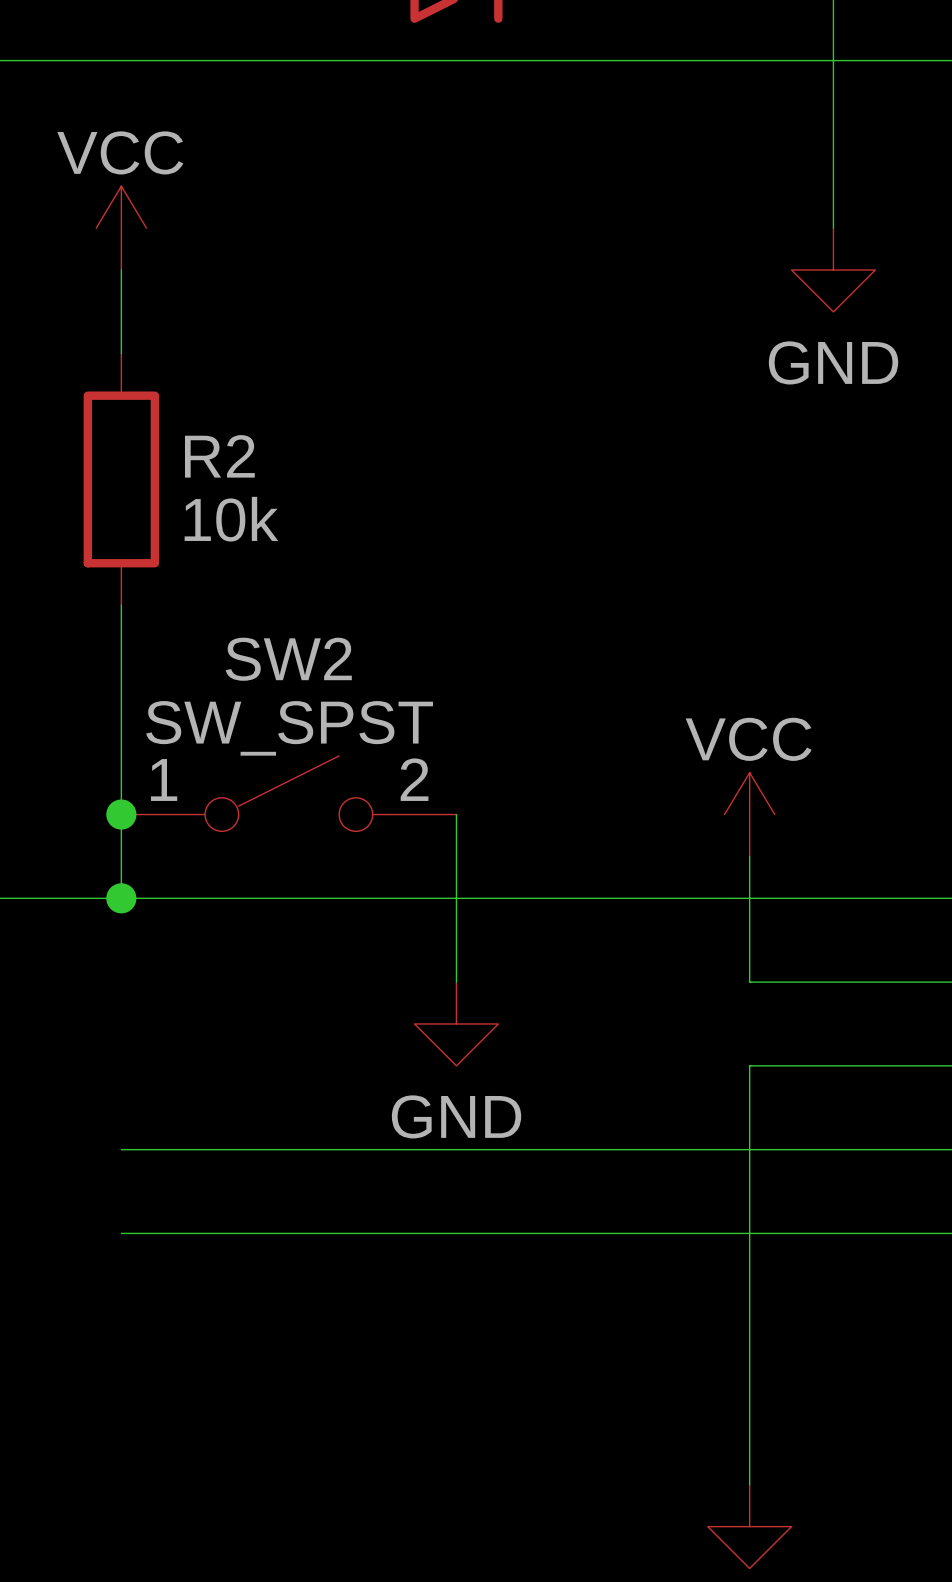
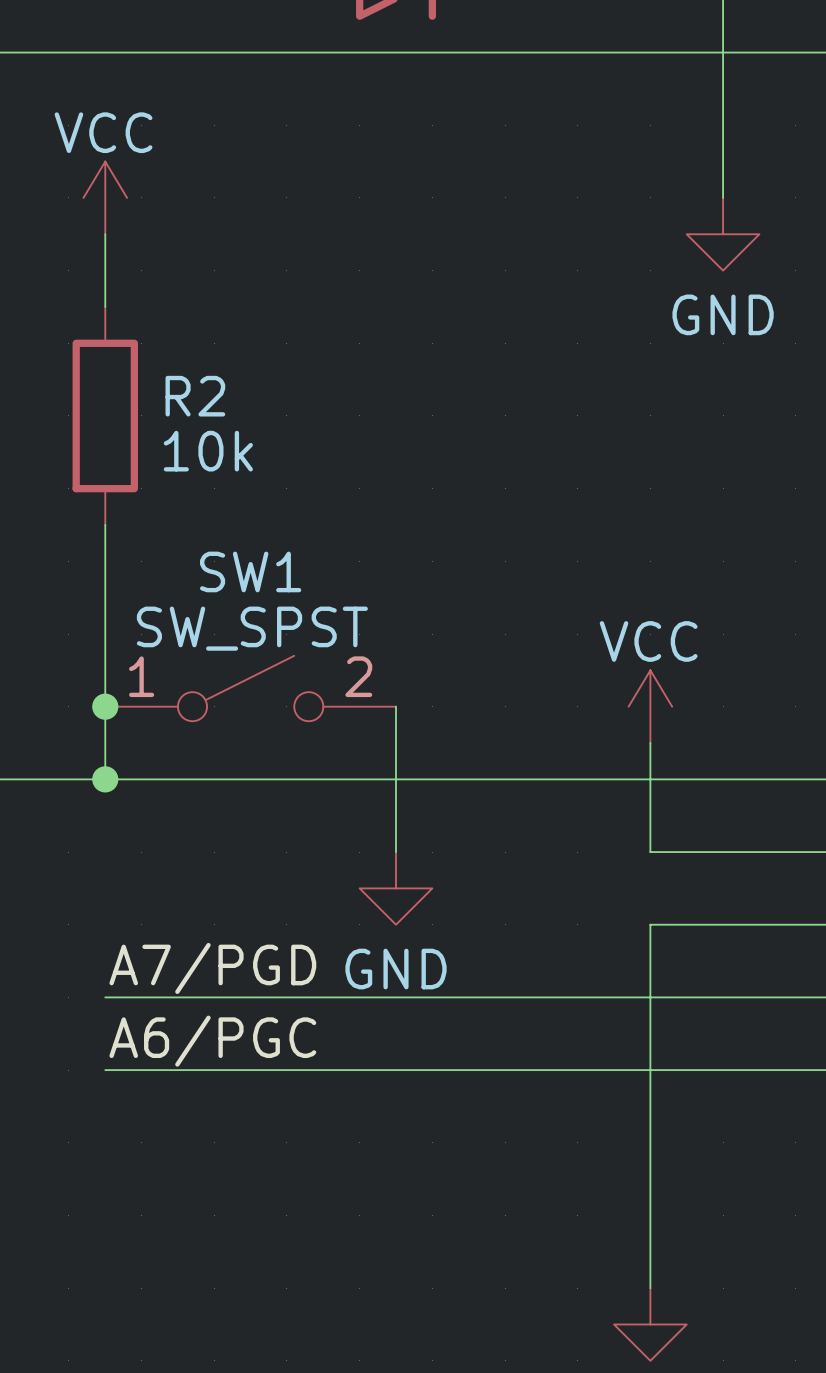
SW2 name: SW2 (288, 659) -> SW1 (250, 571)
label: none -> A7/PGD (212, 968)
label: none -> A6/PGC (212, 1041)

